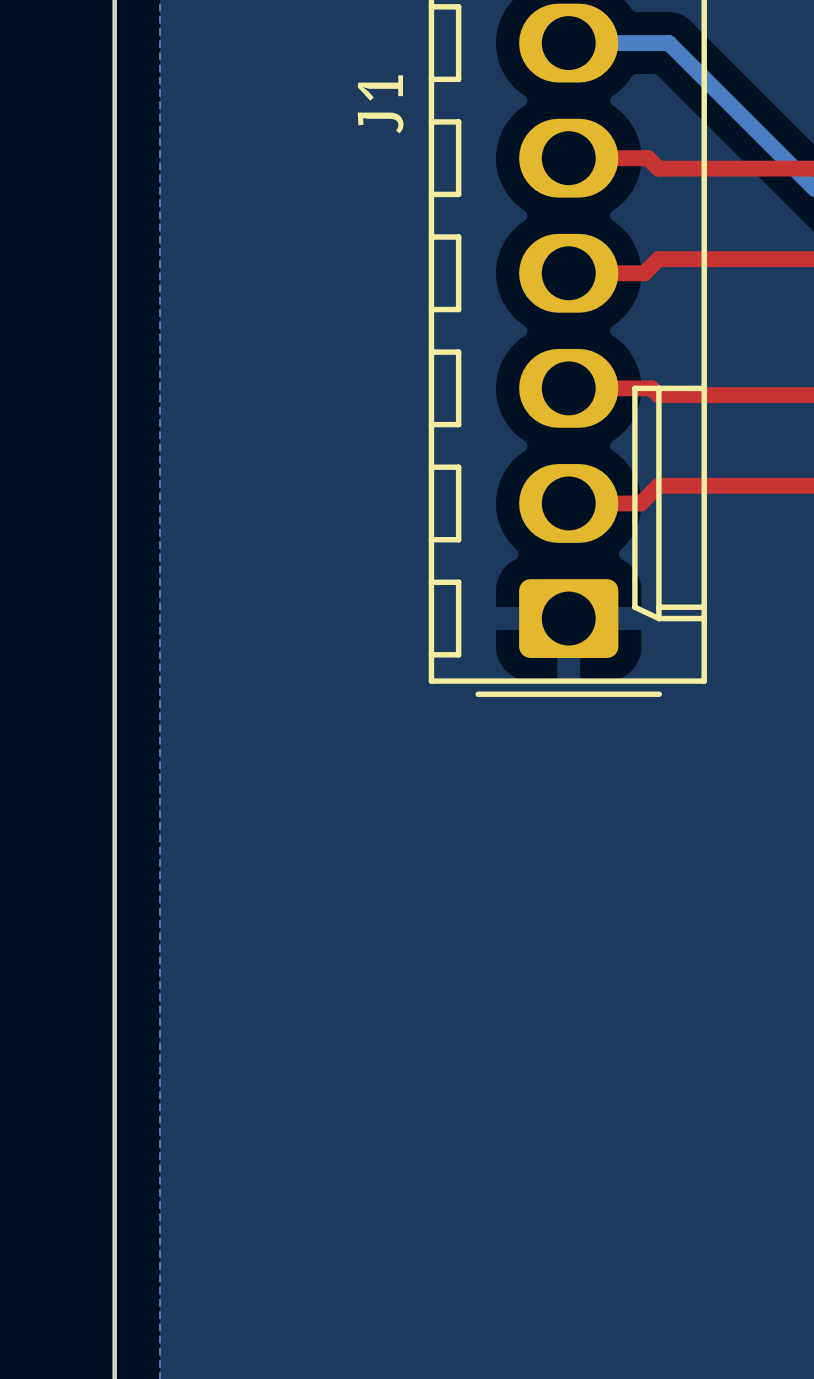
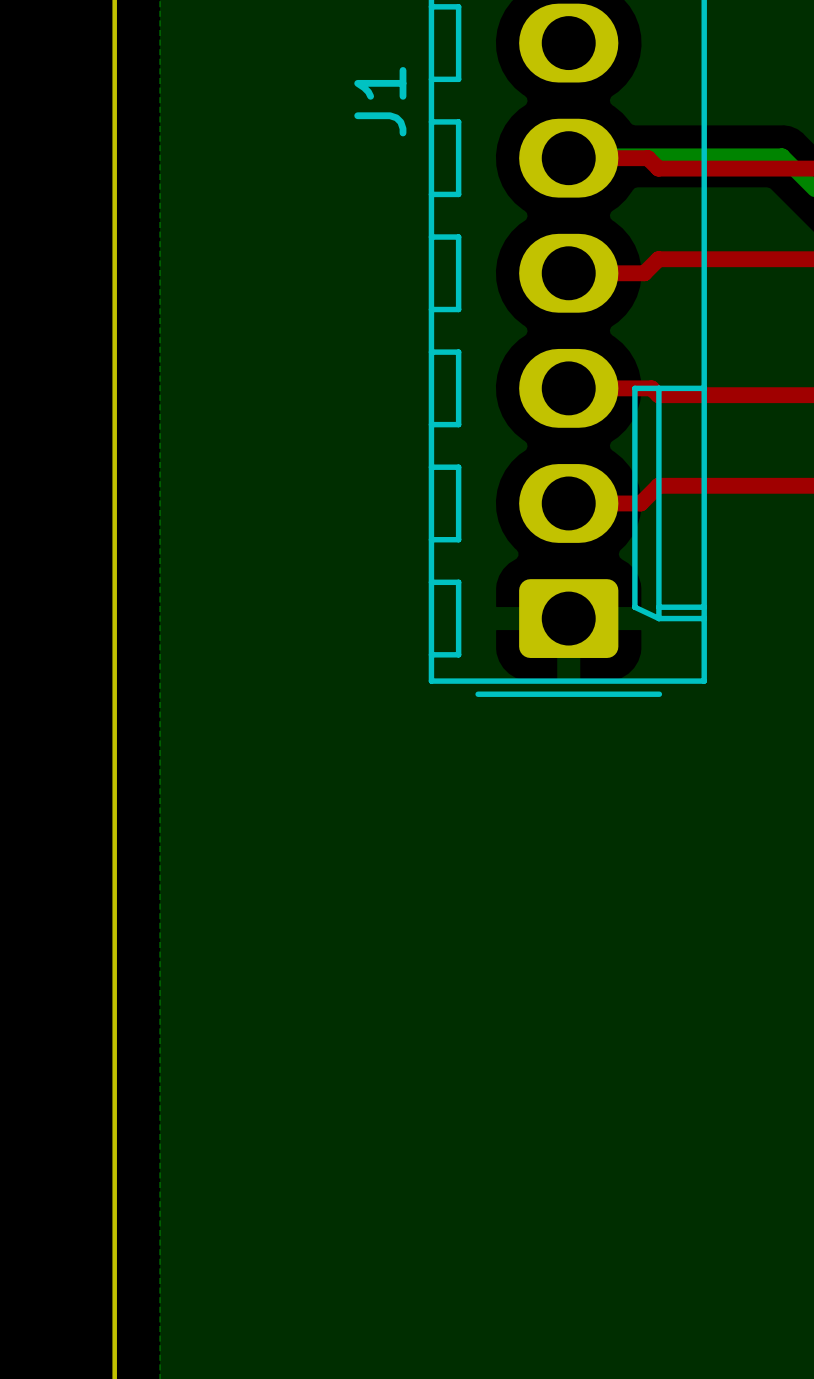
bottom track: (568, 43) (668, 43) (782, 156) -> (568, 156) (782, 156)

